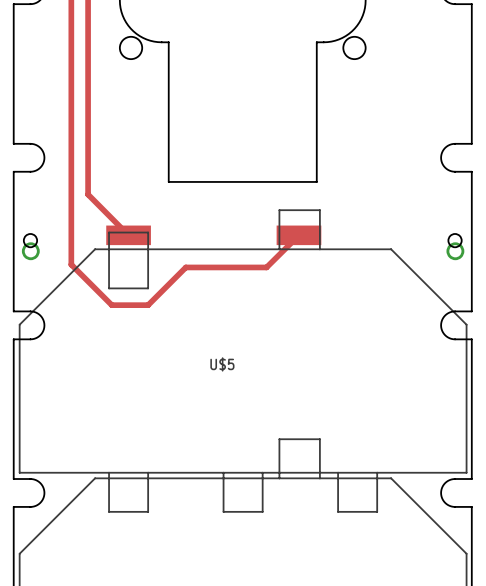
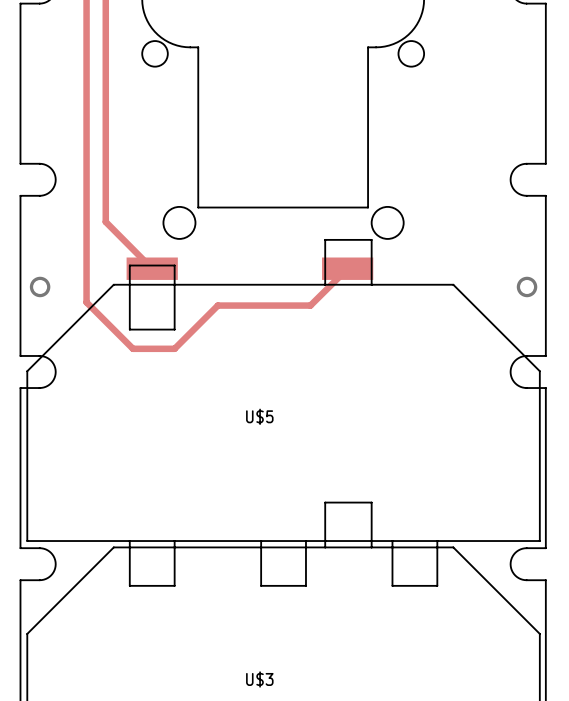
round board edge: none -> [163, 206, 196, 239]
round board edge: none -> [371, 206, 404, 239]
round board edge: [23, 233, 38, 248] -> none
round board edge: [448, 233, 462, 248] -> none

